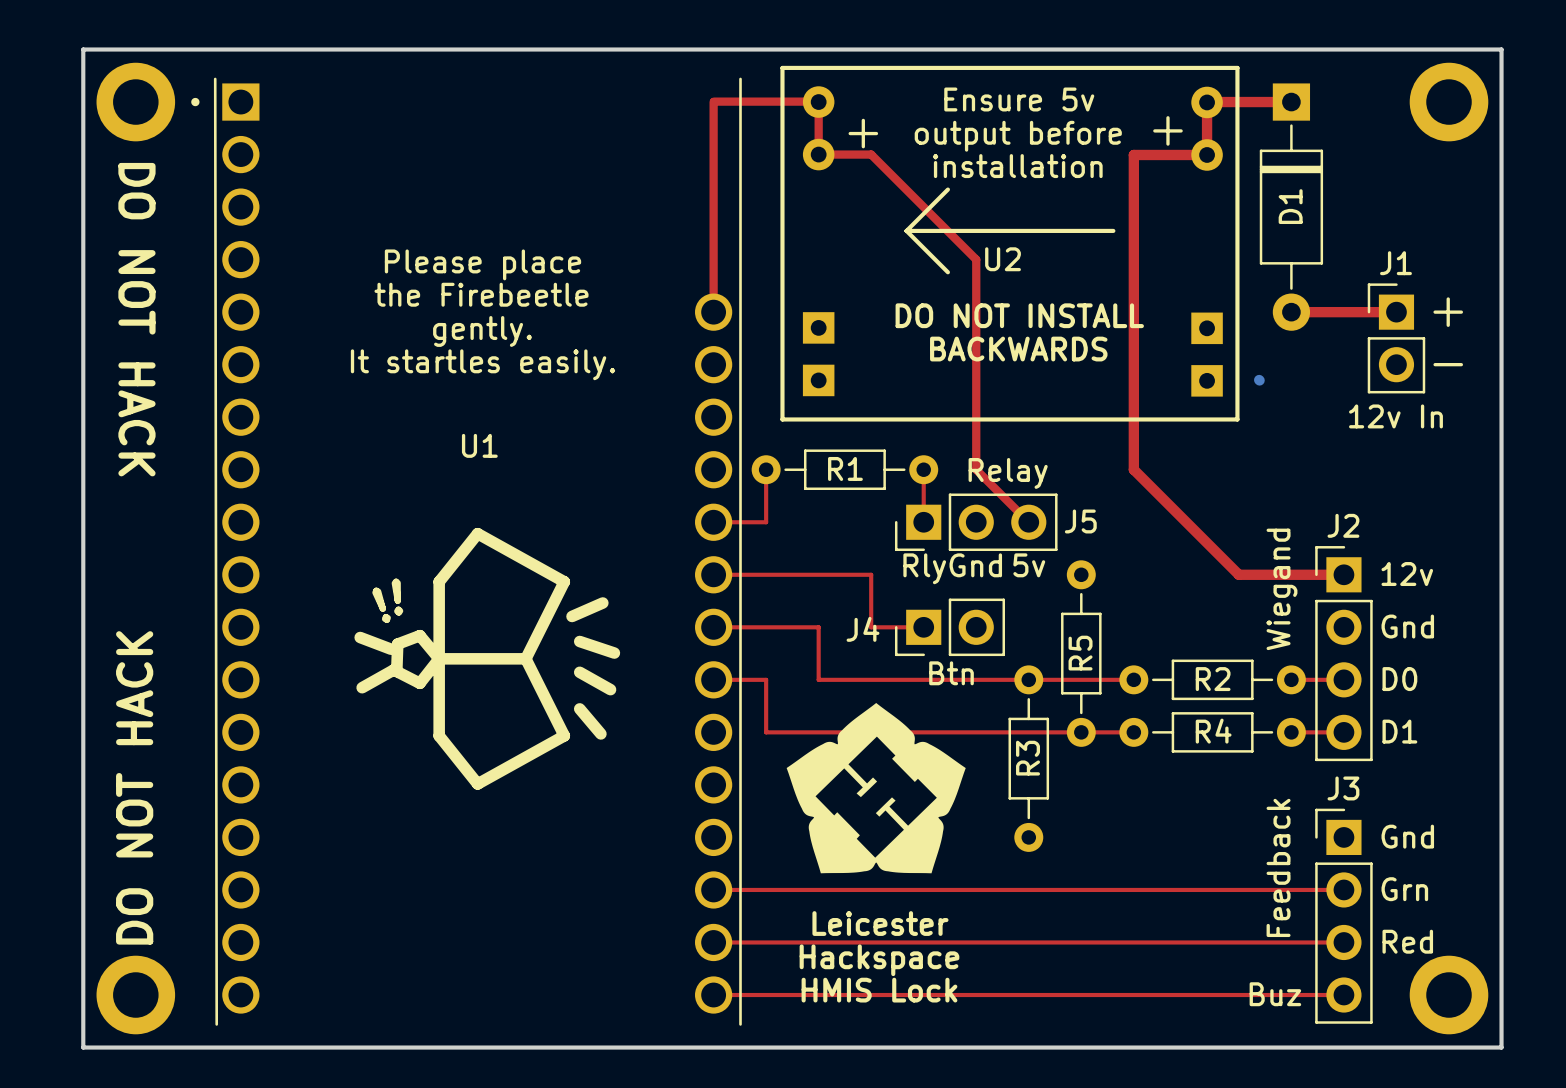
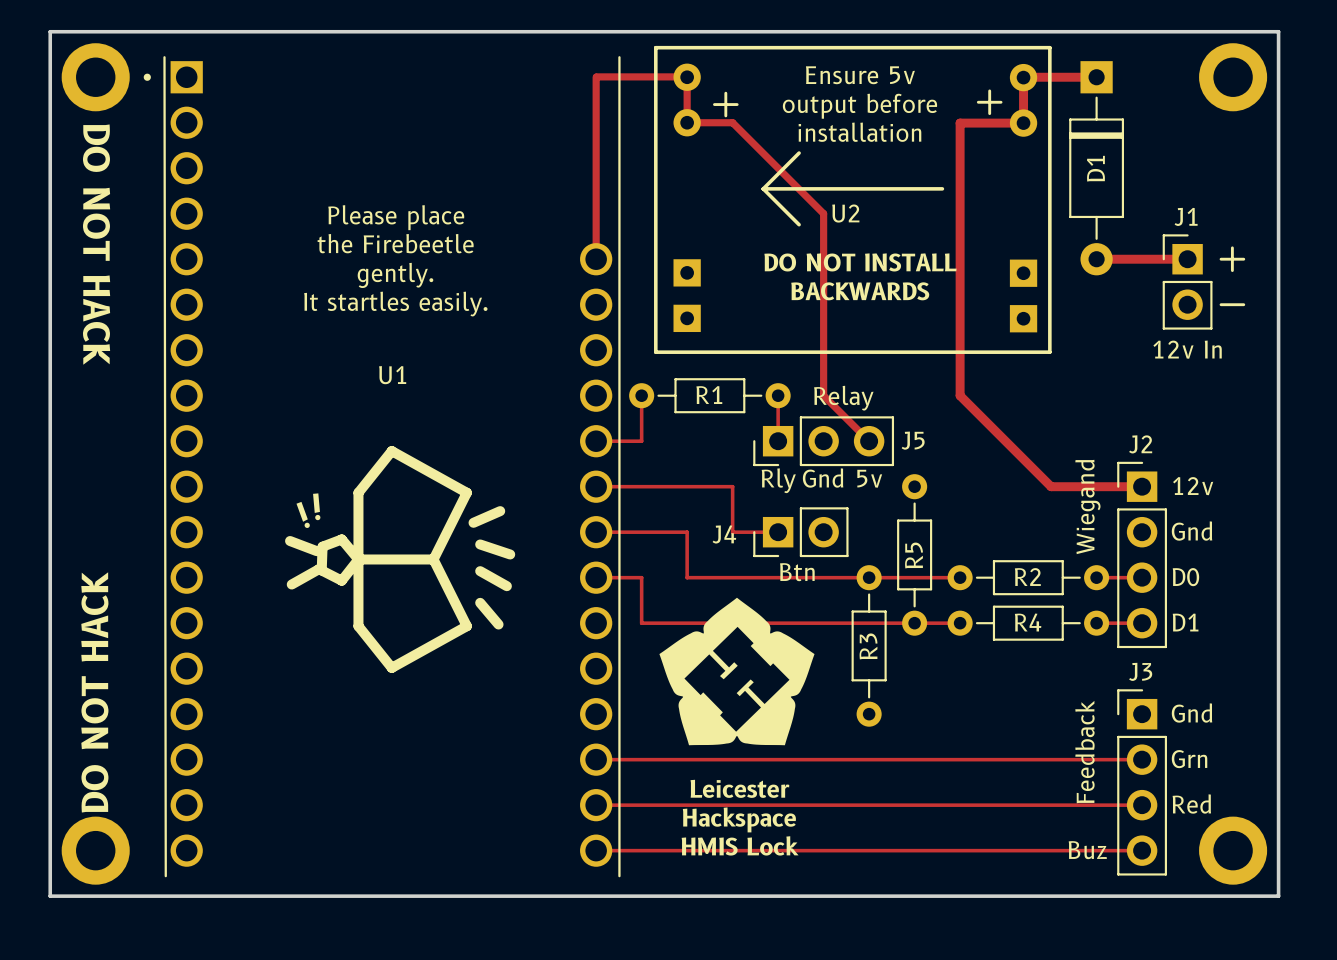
bottom track: (1259, 380) (1259, 380) -> none

